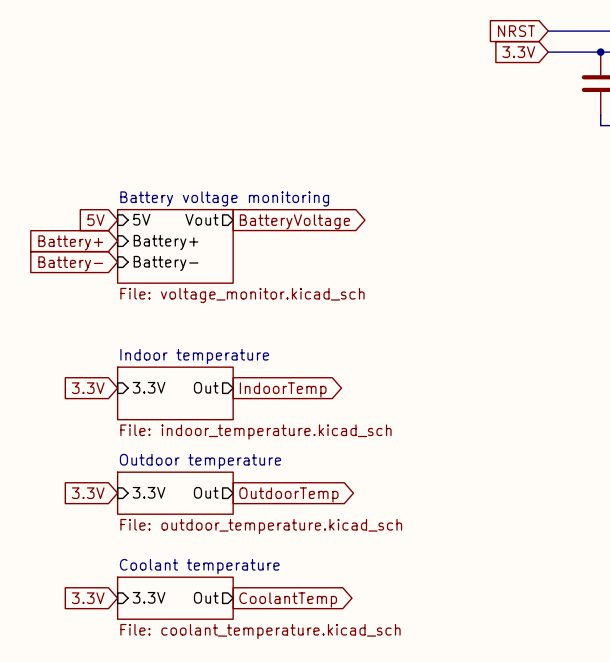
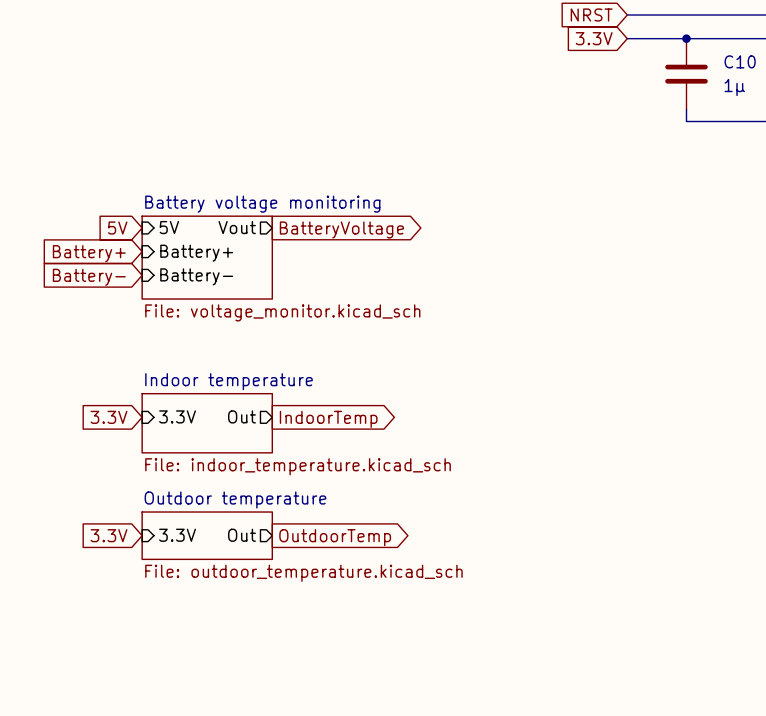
sheet pin: 3.3V (149, 597) -> none
sheet pin: Out (206, 597) -> none
global label: 3.3V (88, 598) -> none
sheet Coolant temperature: File: coolant_temperature.kicad_sch (175, 598) -> none
global label: CoolantTemp (288, 599) -> none

